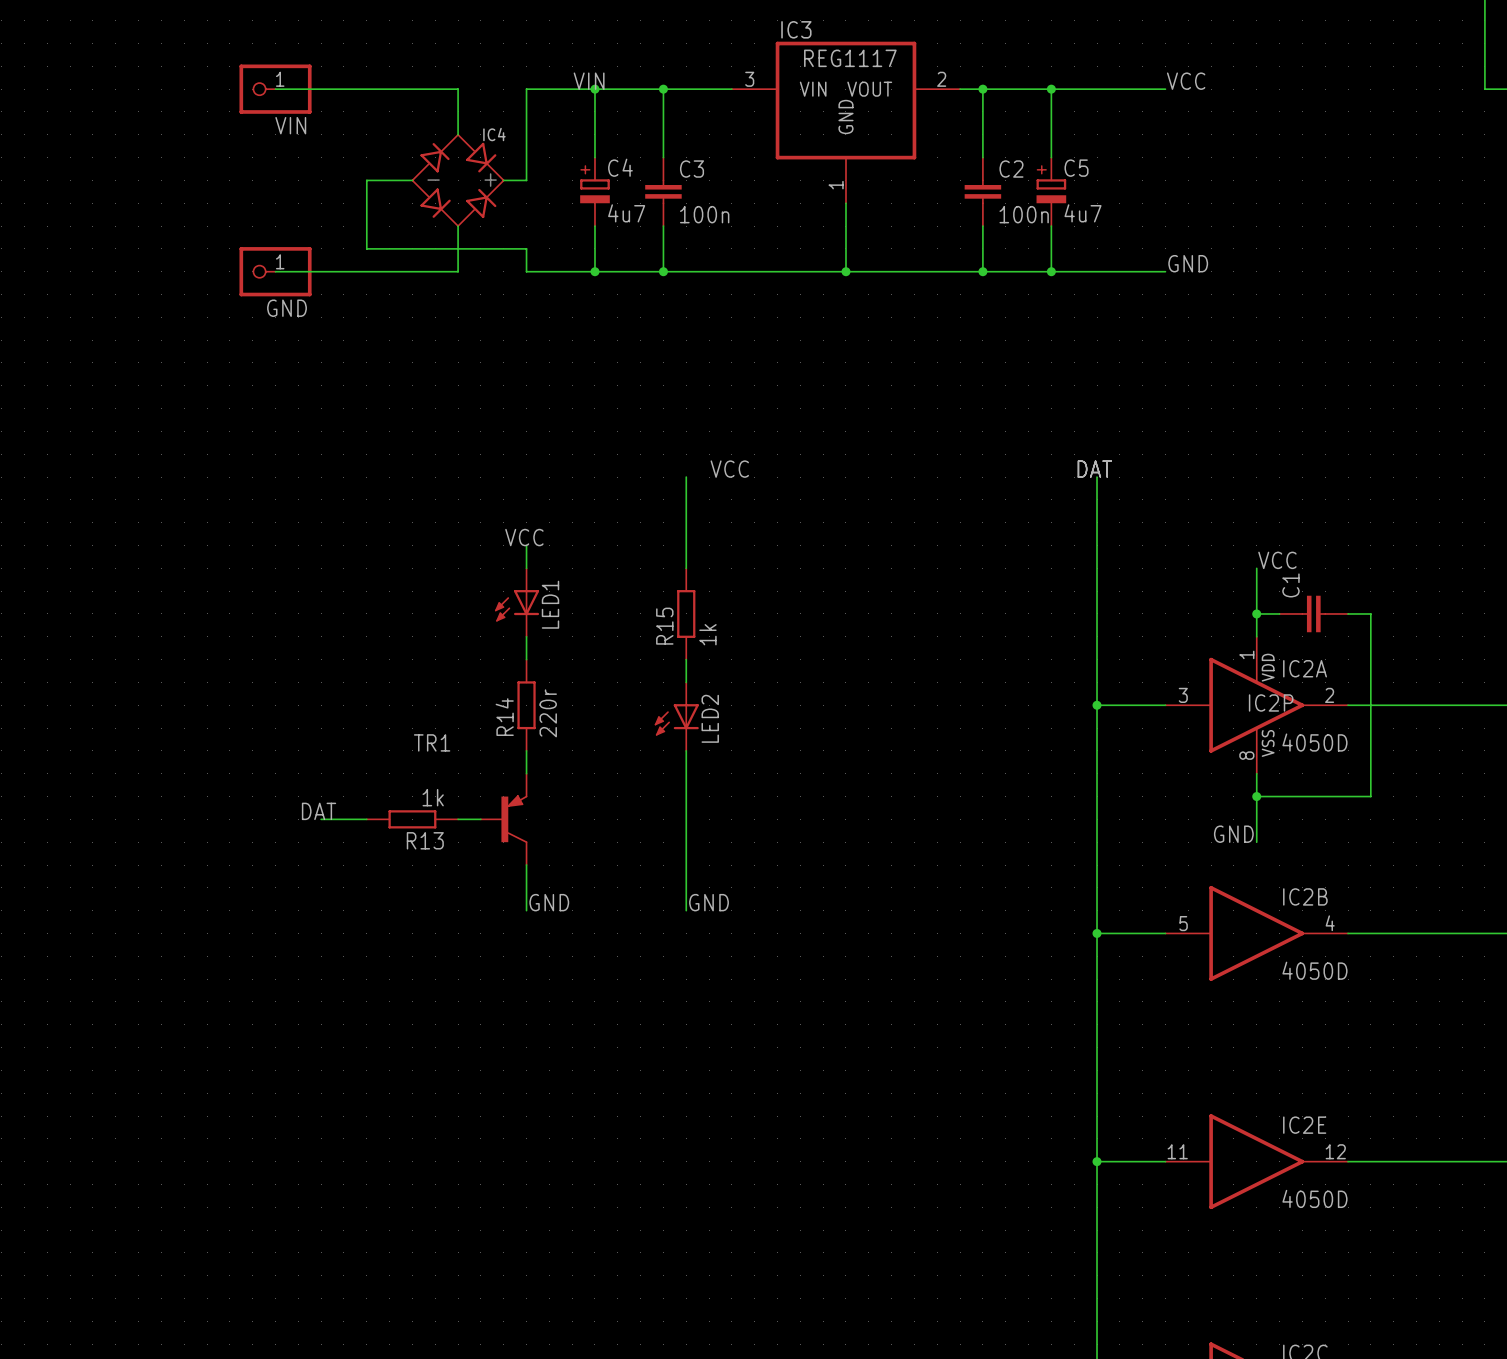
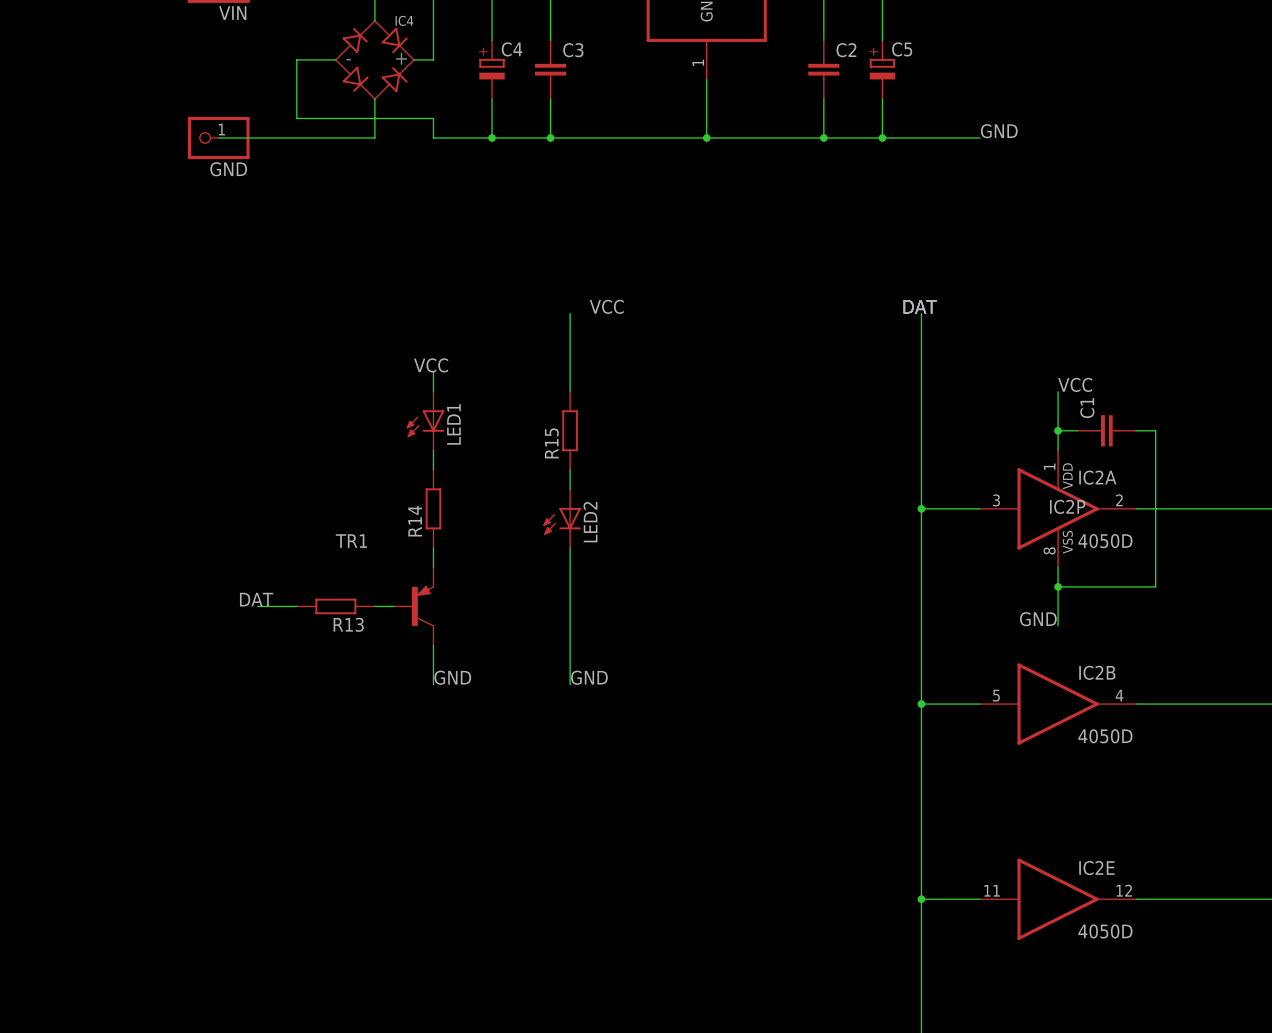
C4 value: 4u7 (626, 213) -> none
C5 value: 4u7 (1083, 213) -> none
C3 value: 100n (704, 214) -> none
C2 value: 100n (1024, 214) -> none
R15 value: 1k (707, 634) -> none
R14 value: 220r (548, 713) -> none
R13 value: 1k (433, 797) -> none

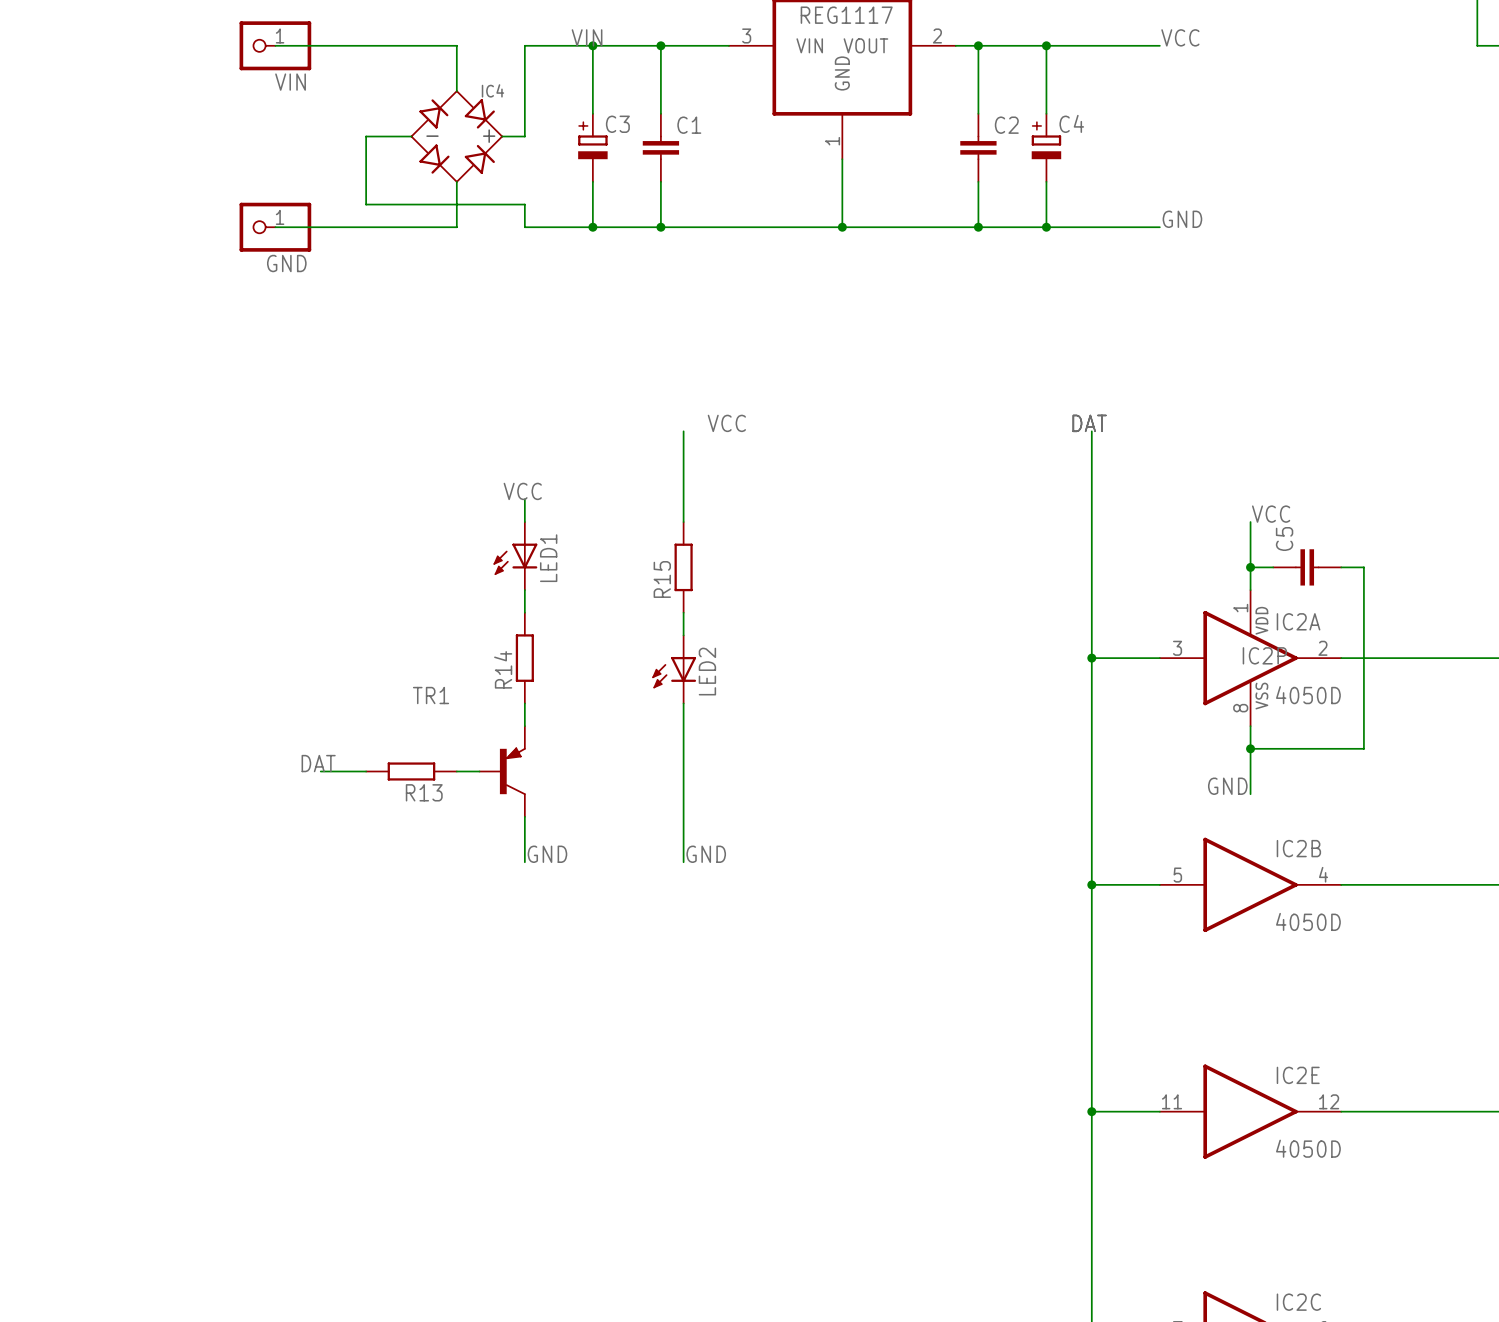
C4 name: C4 (512, 49) -> C3 (617, 124)
C5 name: C5 (902, 49) -> C4 (1071, 123)
C3 name: C3 (573, 50) -> C1 (689, 125)
C1 name: C1 (1087, 408) -> C5 (1284, 539)

